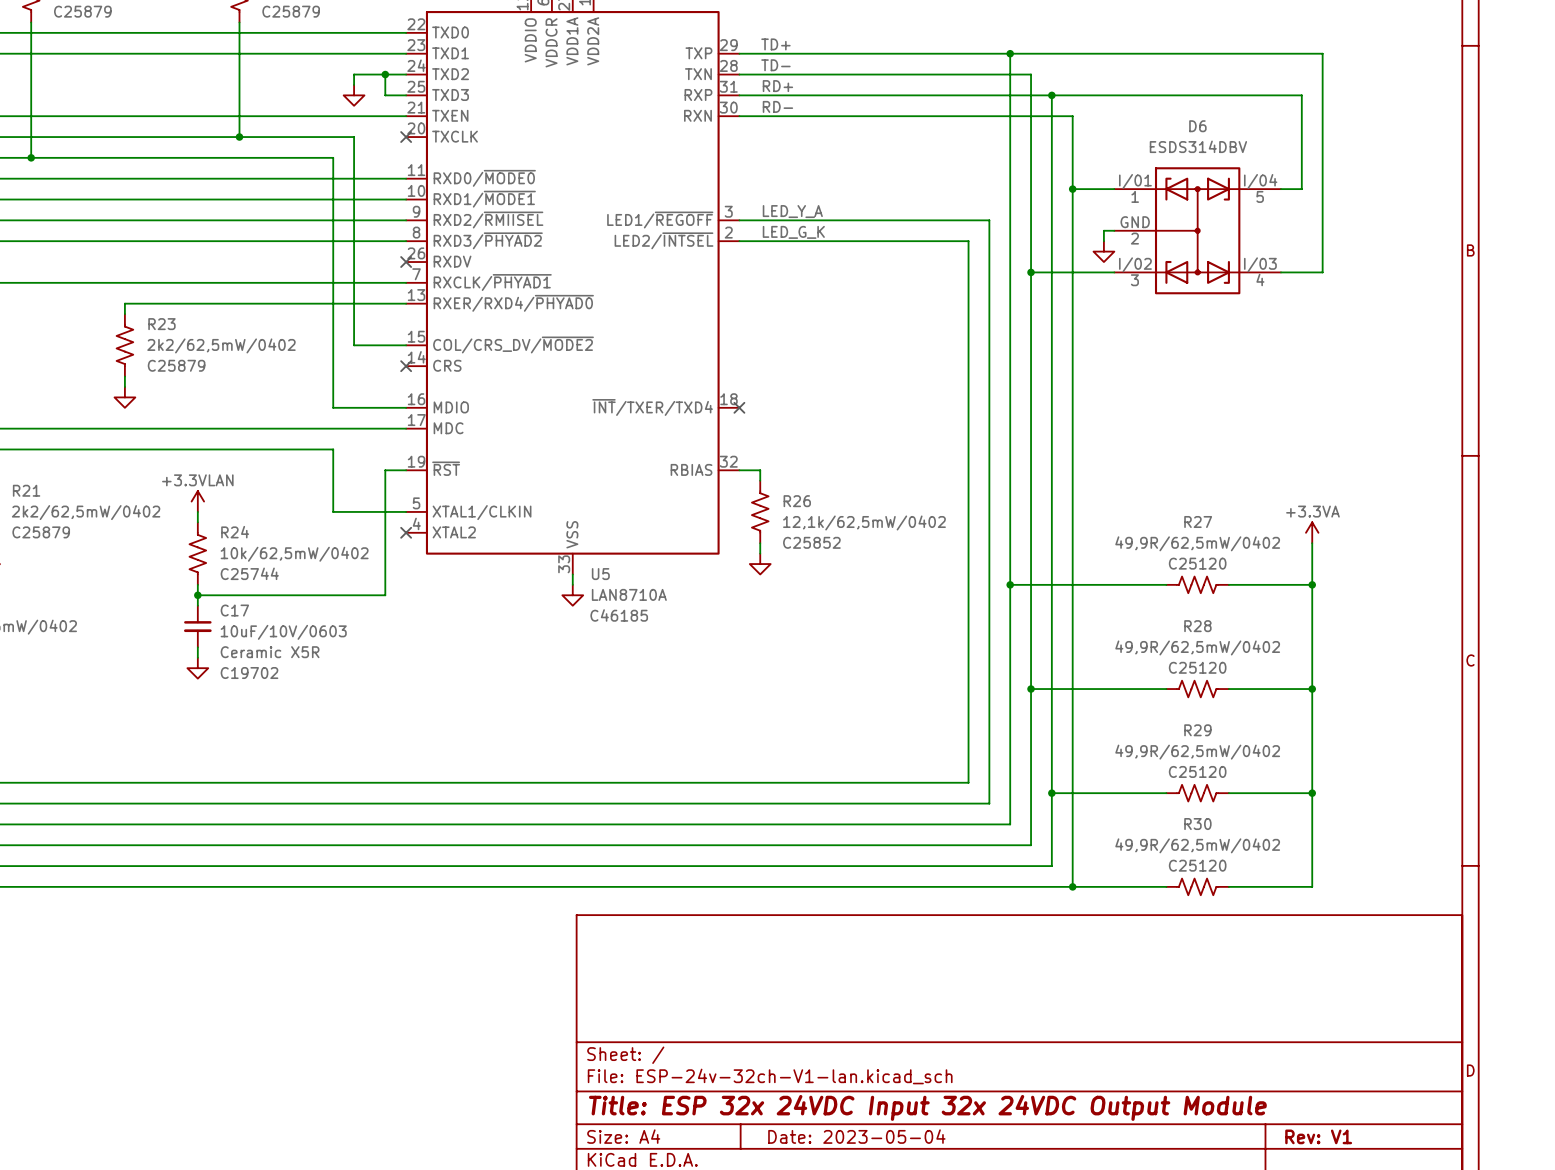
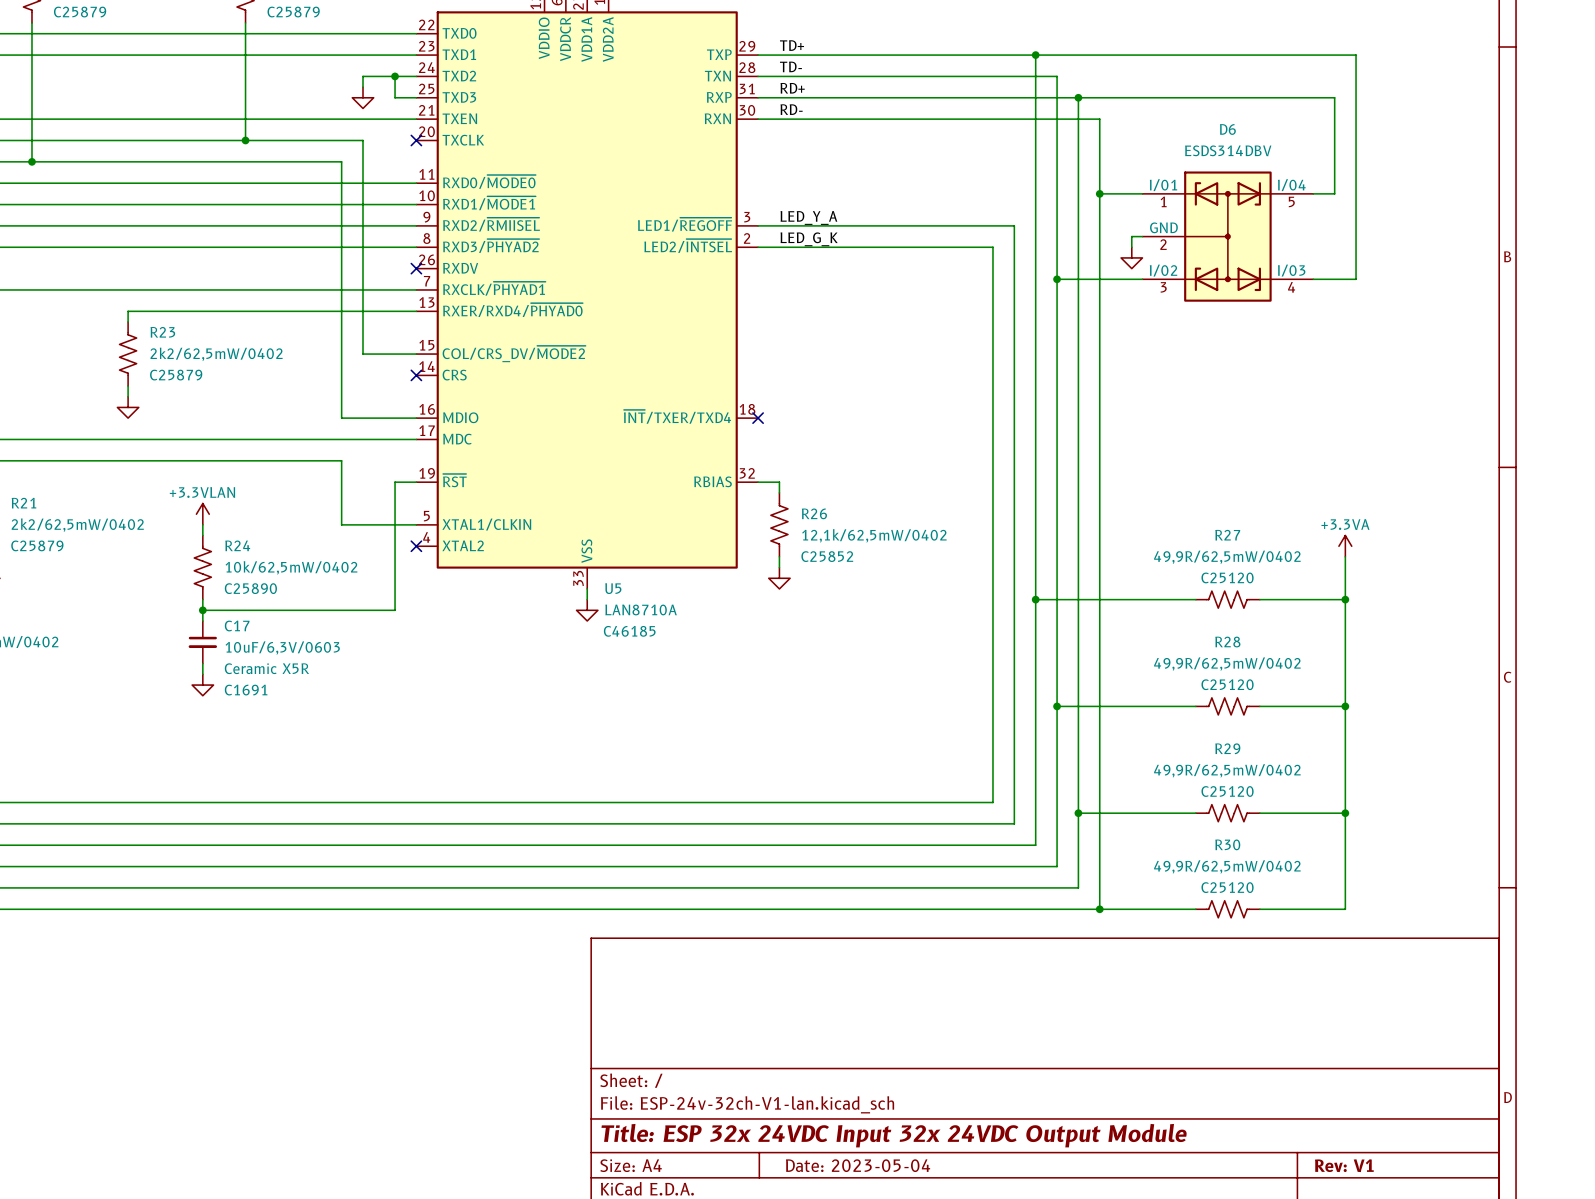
R24 text: C25744 (249, 573) -> C25890 (250, 588)
C17 value: 10uF/10V/0603 (283, 632) -> 10uF/6,3V/0603 (282, 648)
C17 text: C19702 (249, 673) -> C1691 (246, 690)

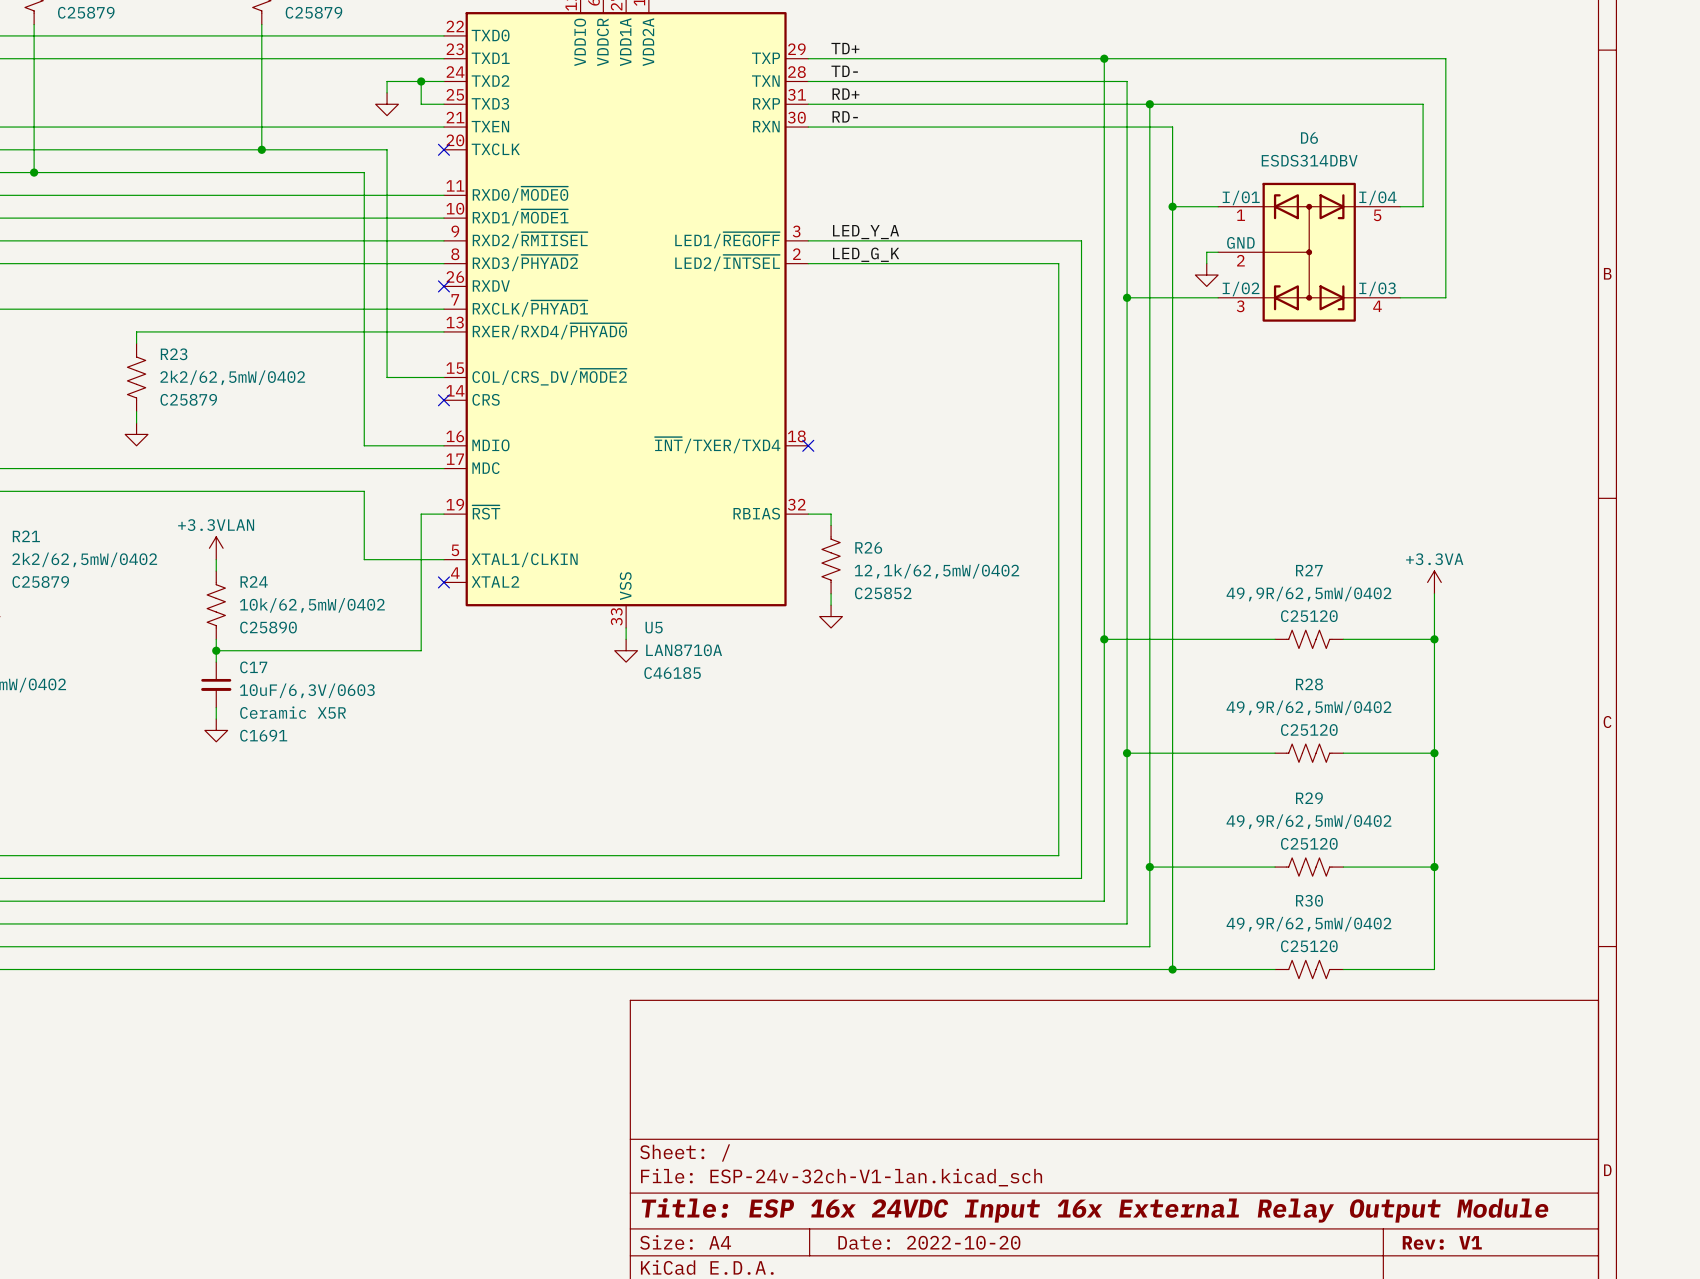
title block: Title: ESP 32x 24VDC Input 32x 24VDC Output Module (894, 1135) -> Title: ESP 16x 24VDC Input 16x External Relay Output Module (1095, 1210)
title block: Date: 2023-05-04 (858, 1165) -> Date: 2022-10-20 (929, 1242)

